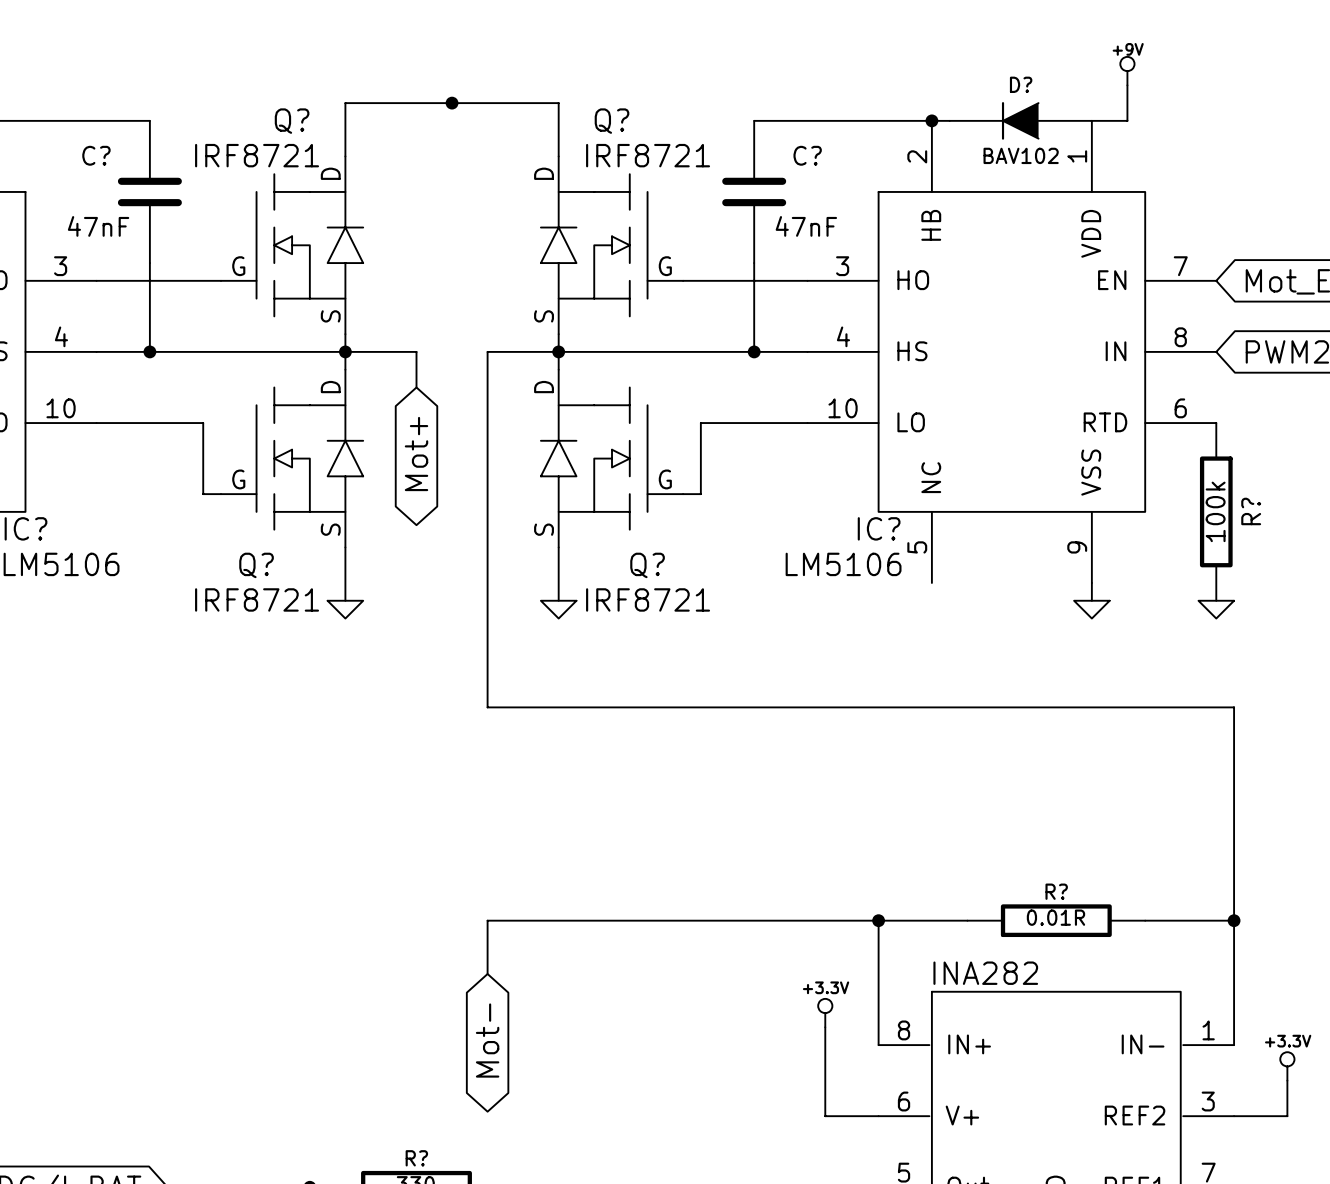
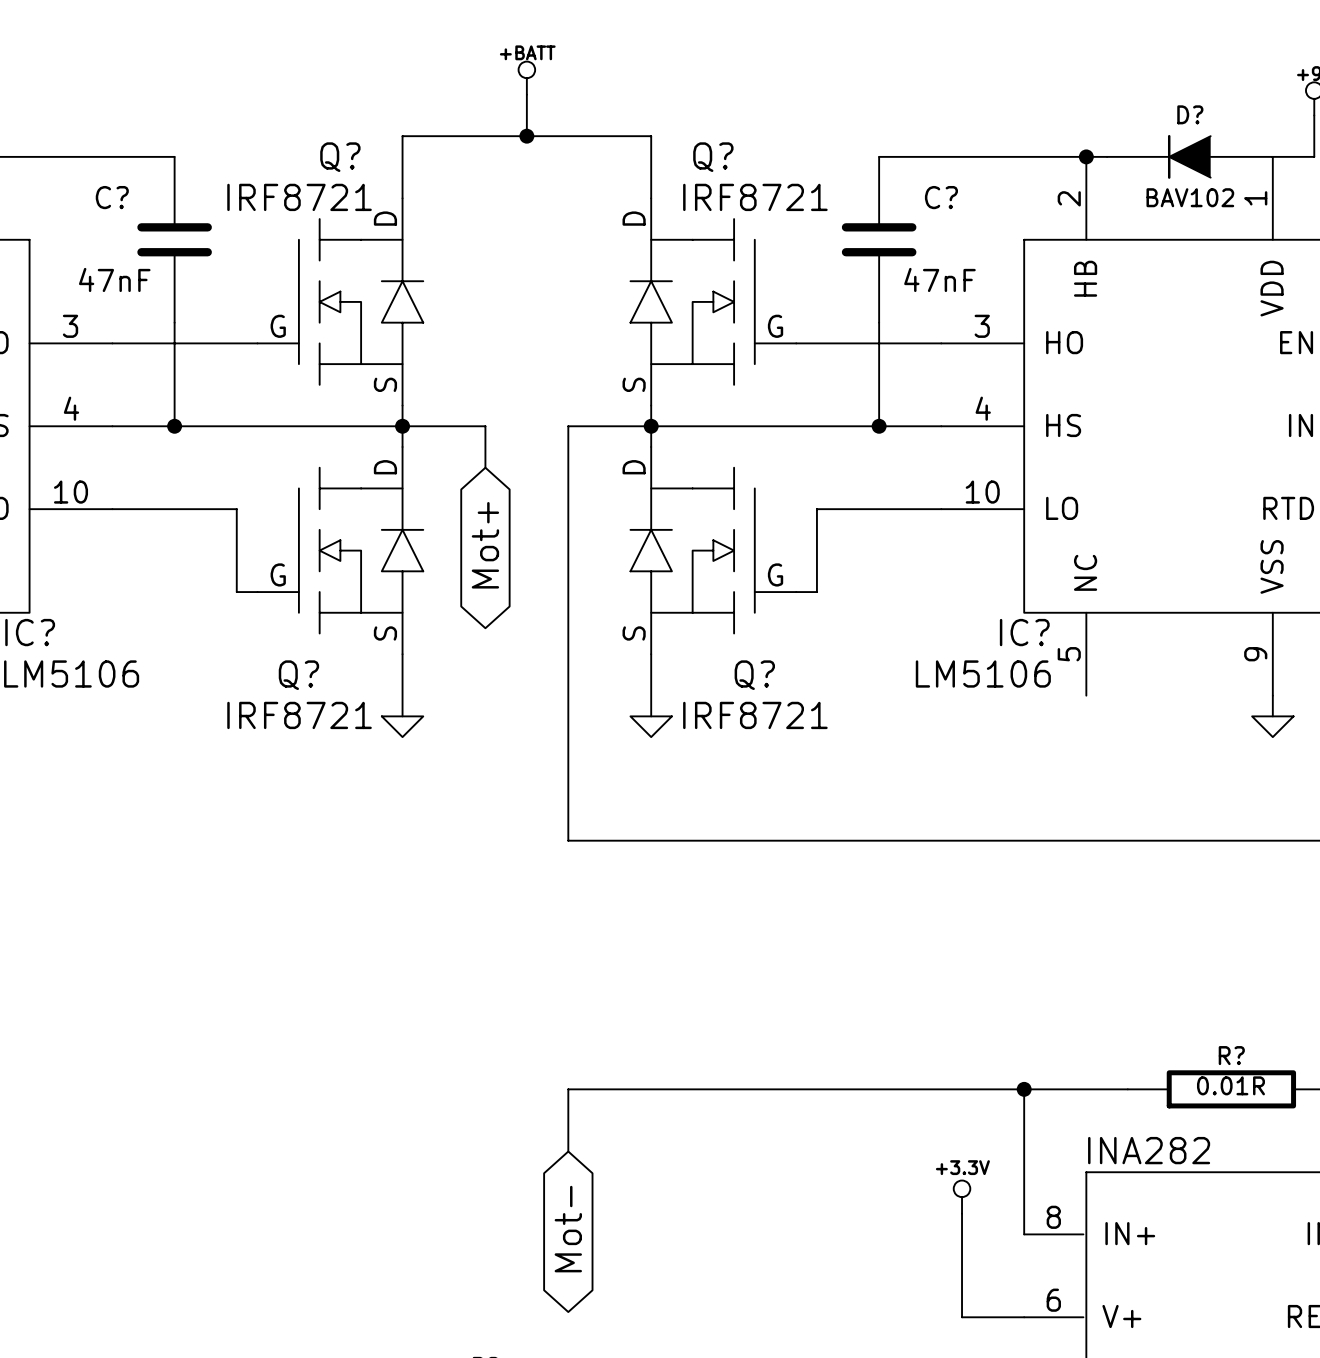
power symbol: none -> +BATT (526, 78)
wire: none -> (526, 94) (526, 136)

